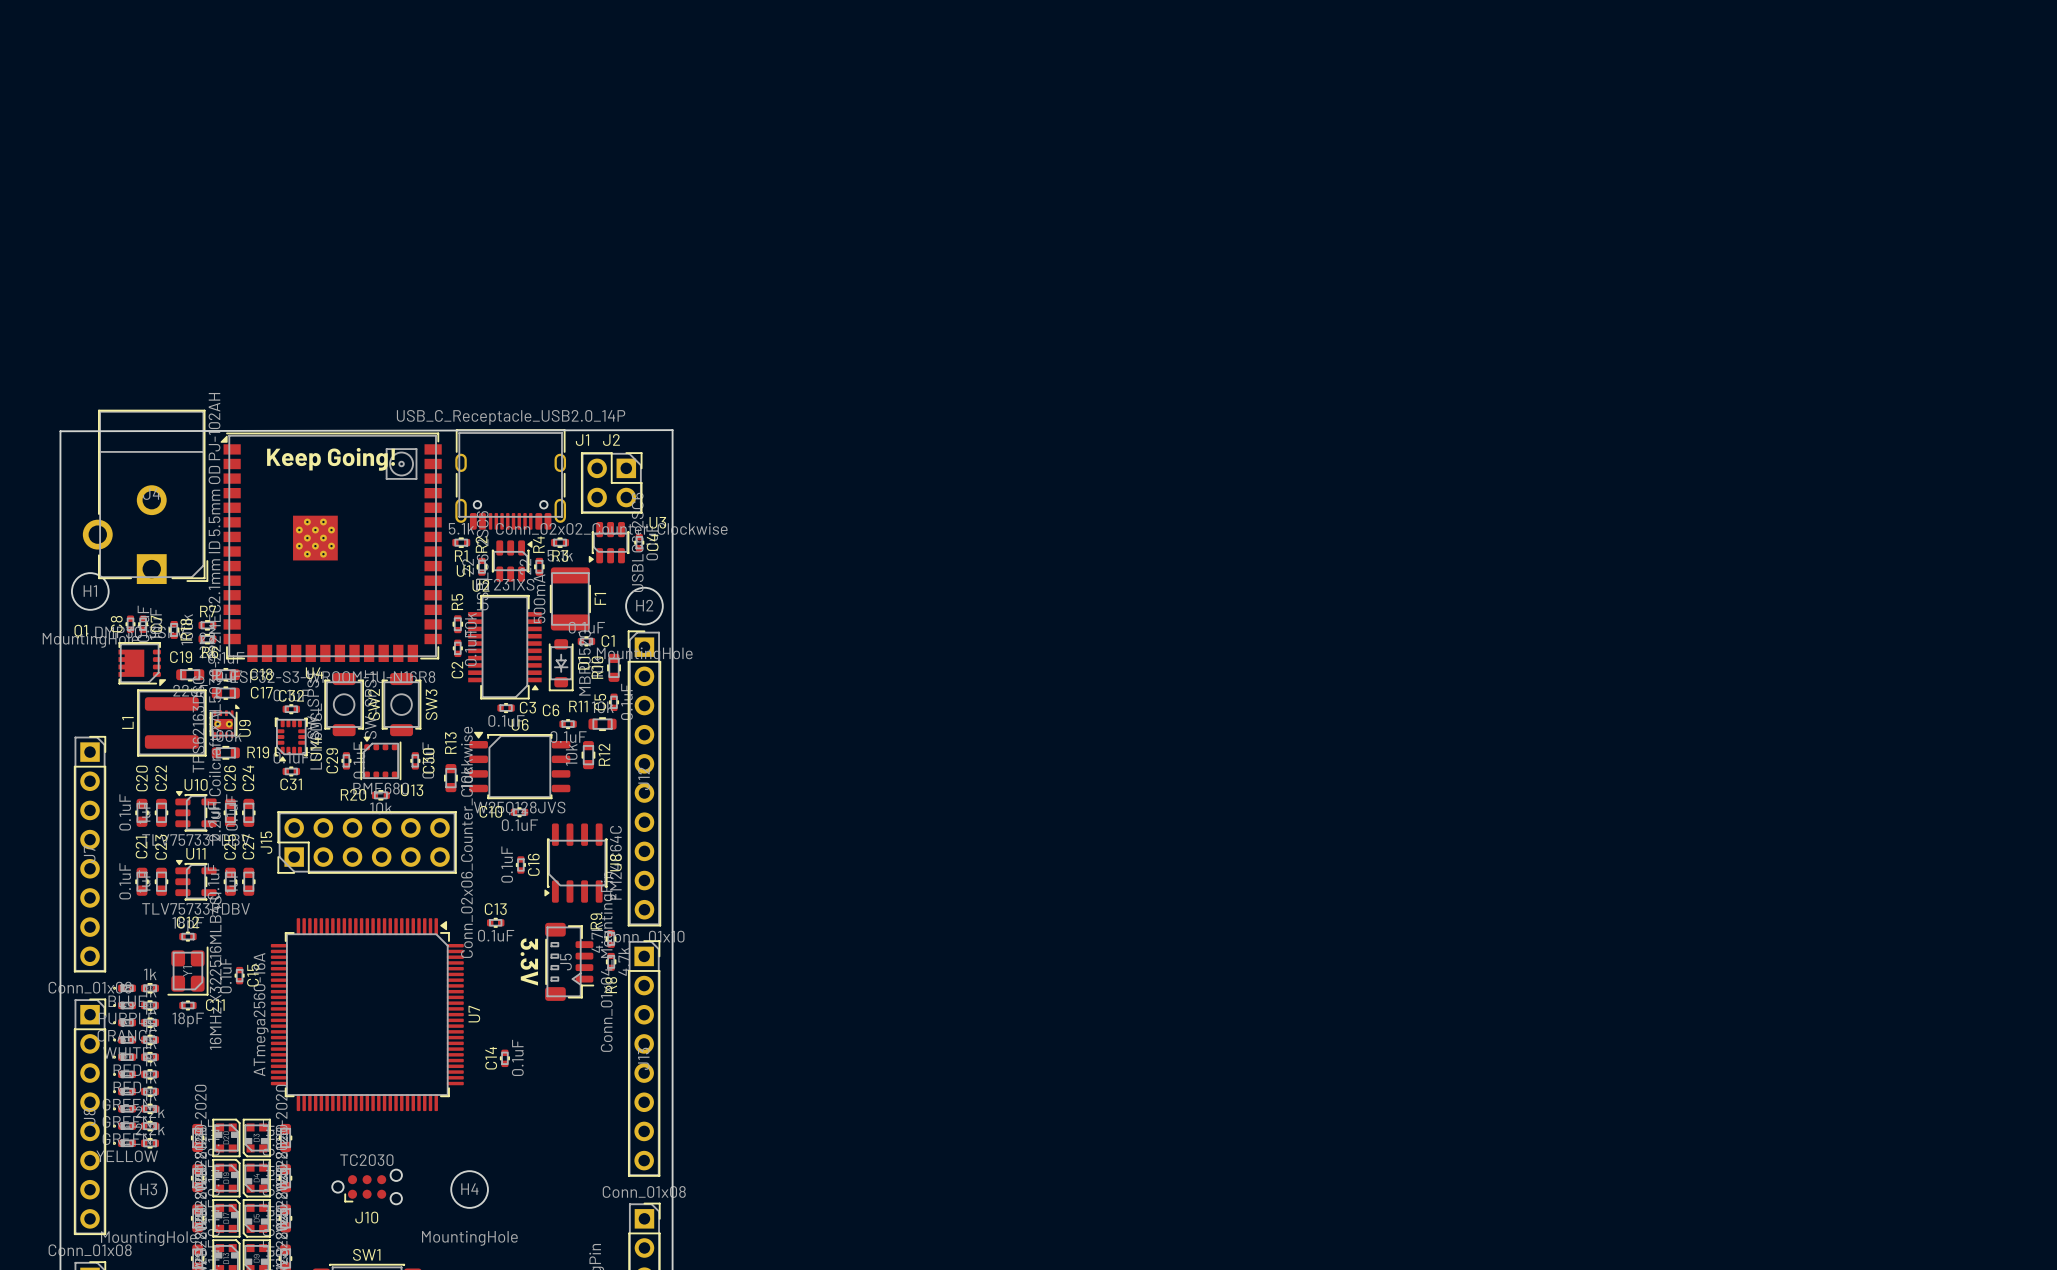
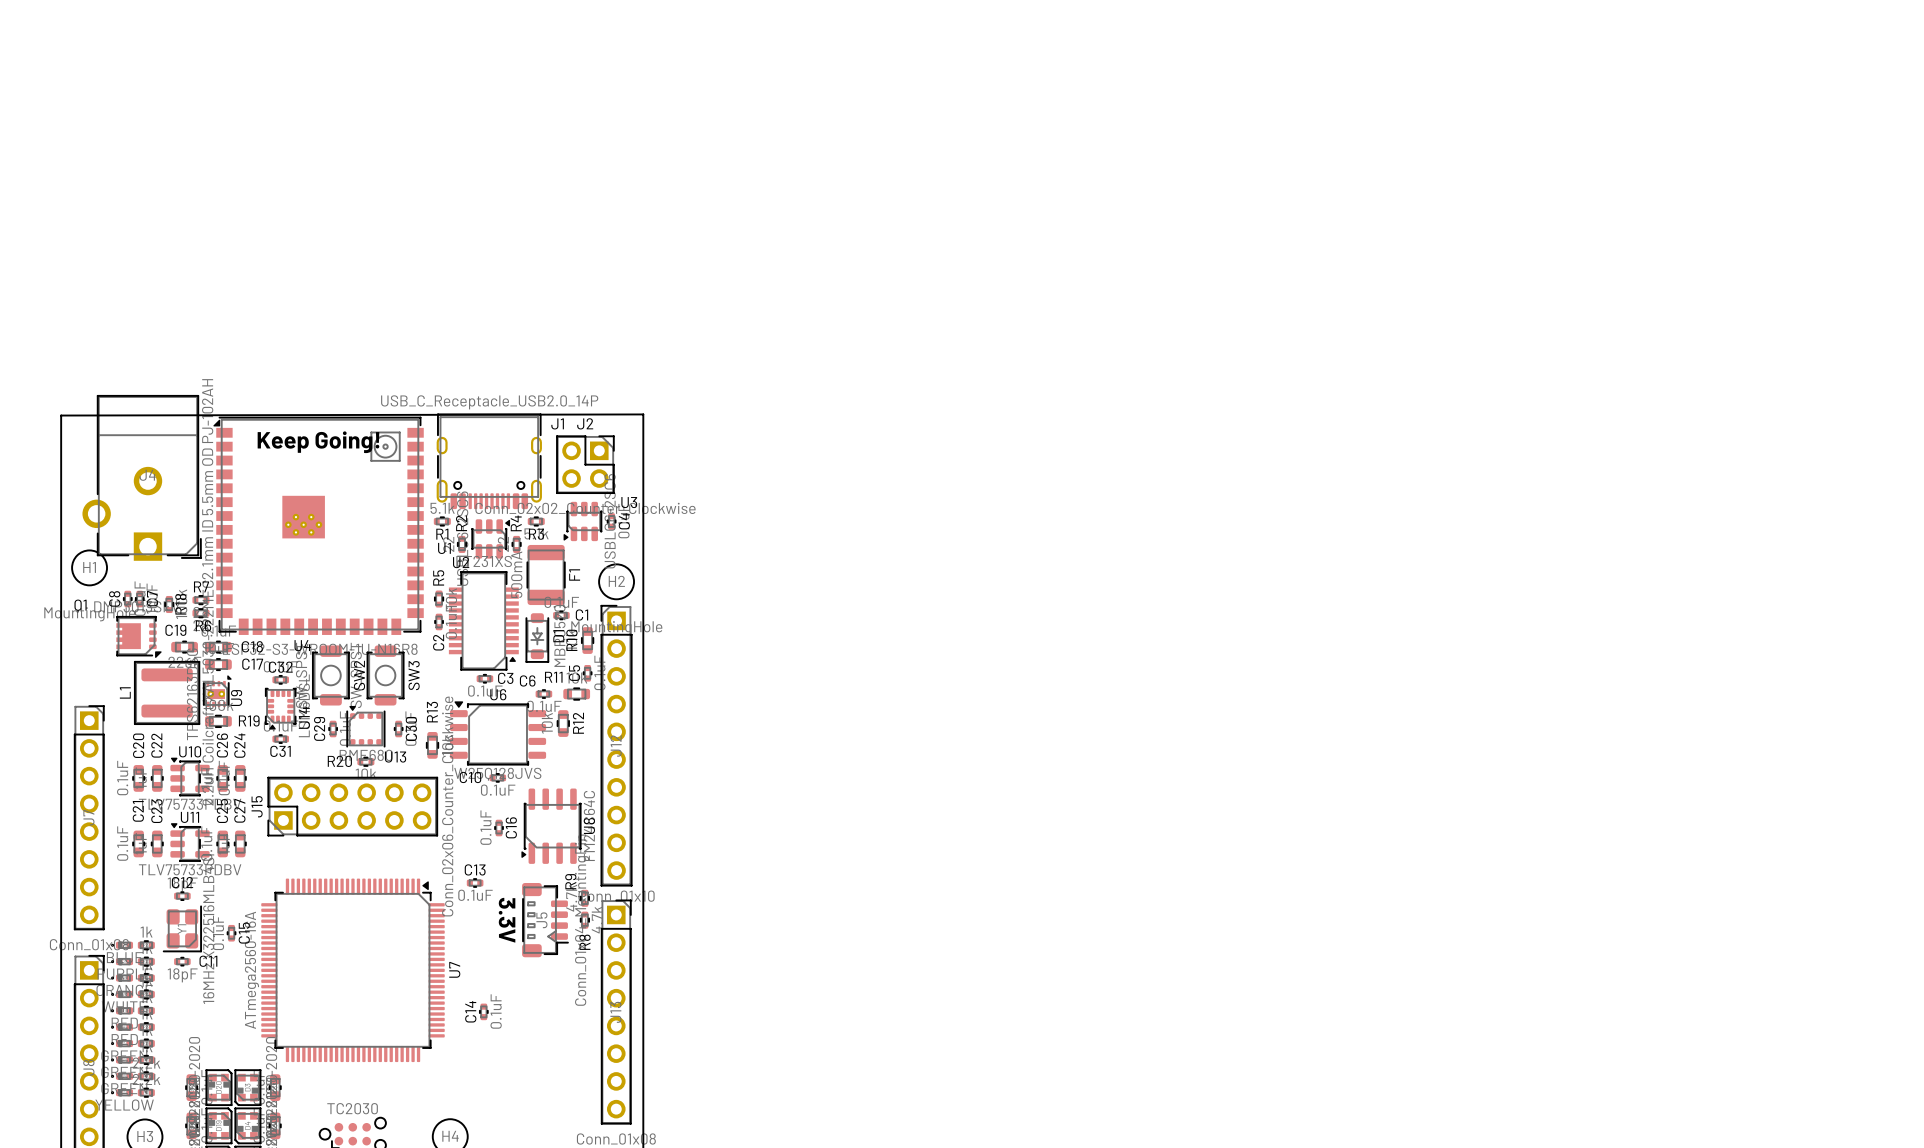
U4 footprint: [220, 432, 442, 662] -> [213, 416, 424, 635]

